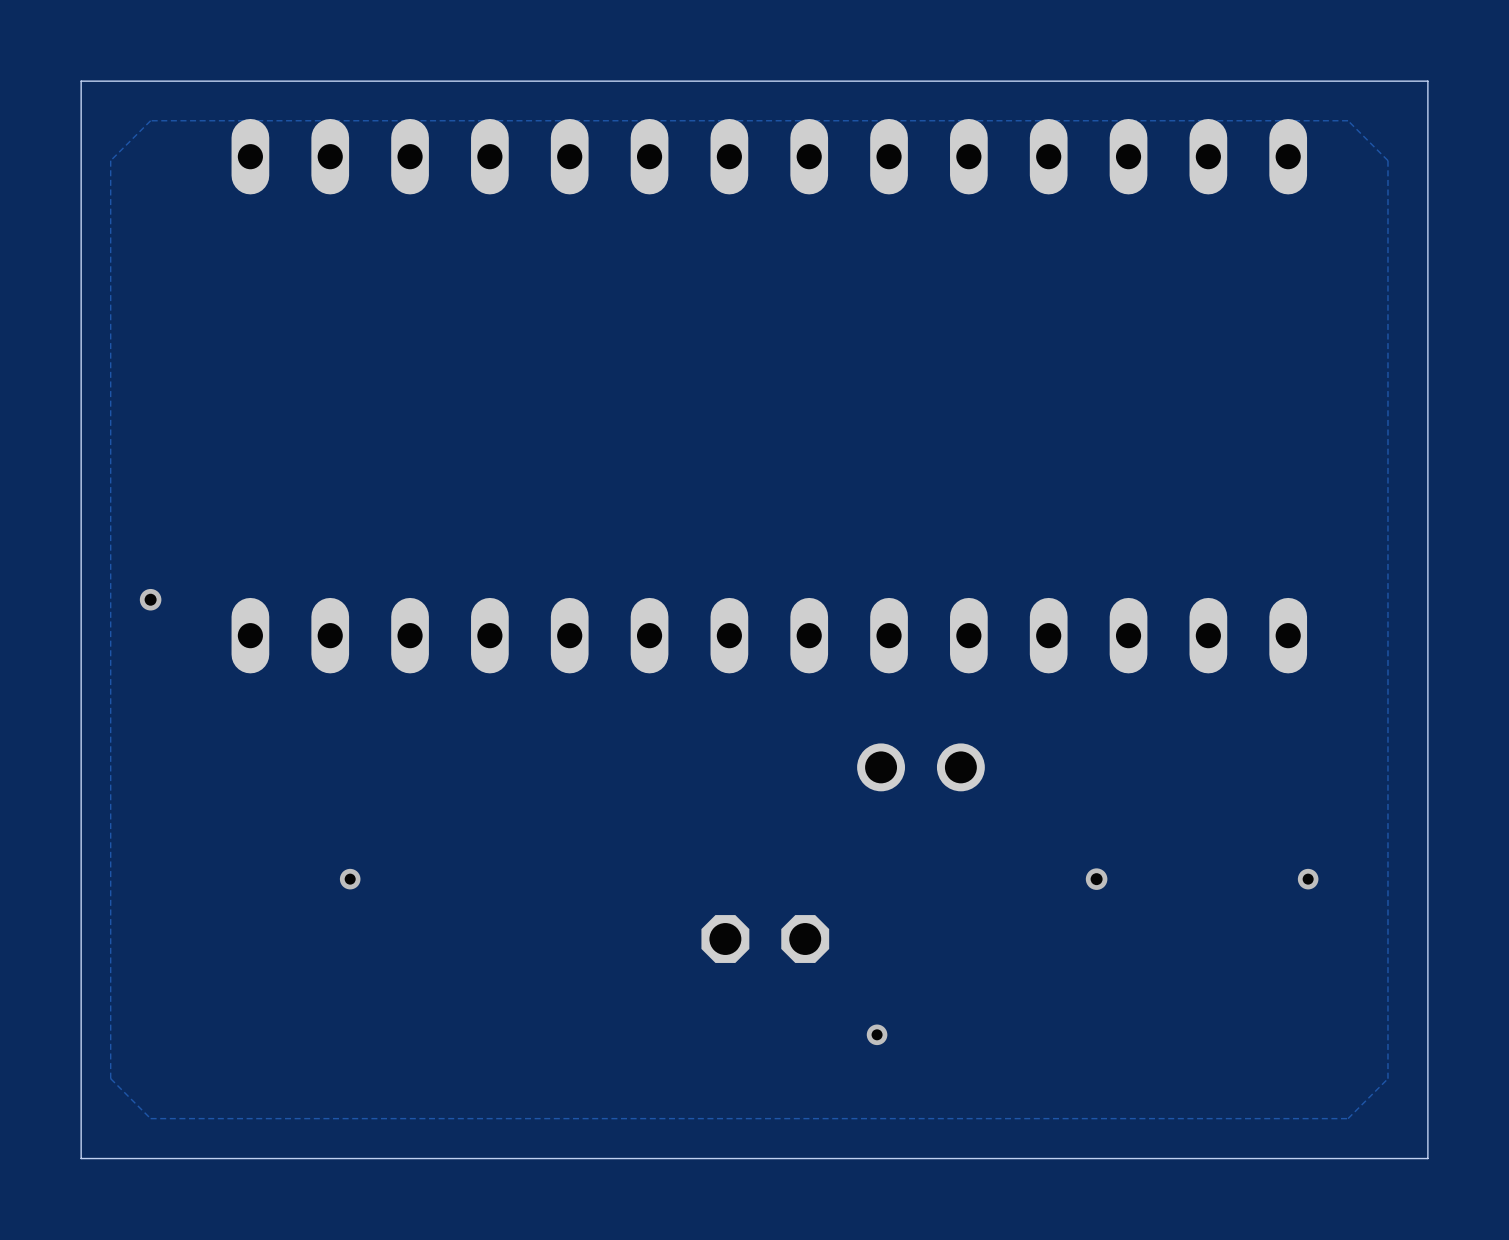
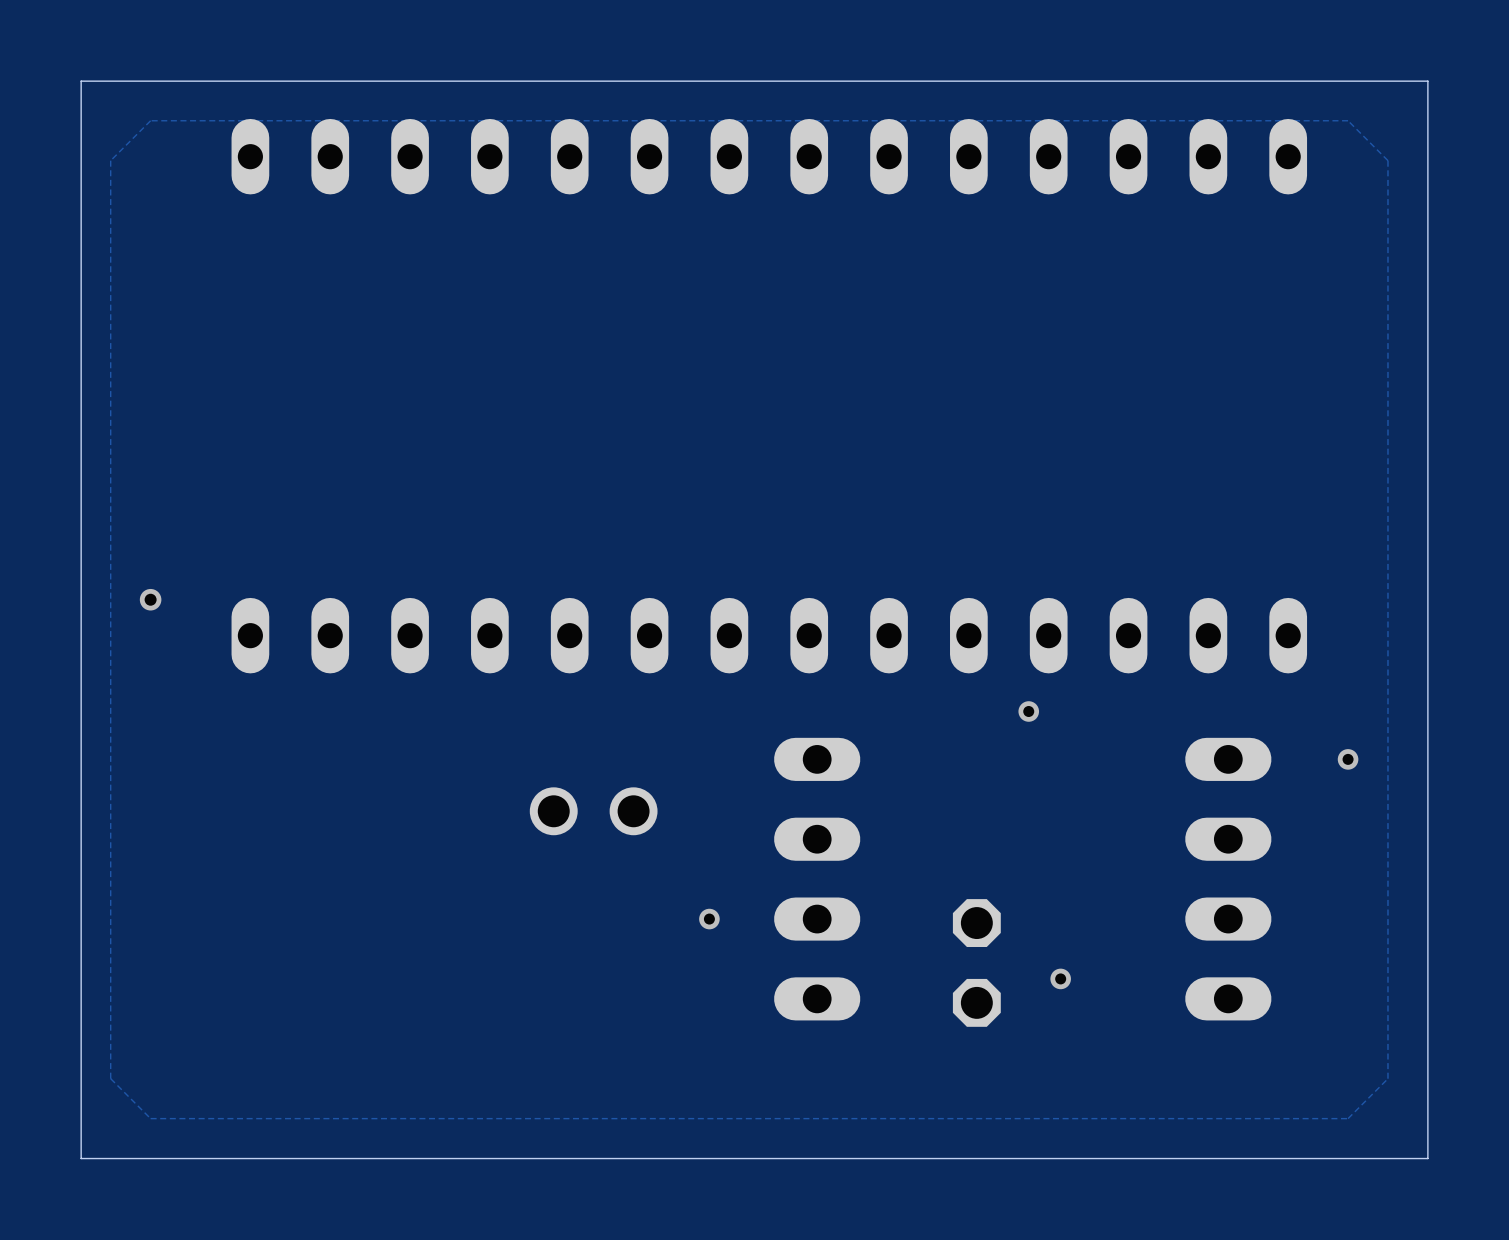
via: none -> (1028, 711)
part position: (920, 767) -> (593, 811)
via: (350, 879) -> none
part: none -> (817, 879)
via: (1096, 879) -> none
part: none -> (1228, 879)
via position: (1308, 879) -> (1348, 759)
via: none -> (709, 919)
part rotation: 0° (765, 939) -> 90° clockwise (976, 962)
part position: (765, 939) -> (976, 962)
via: none -> (1060, 978)
via: (877, 1034) -> none

